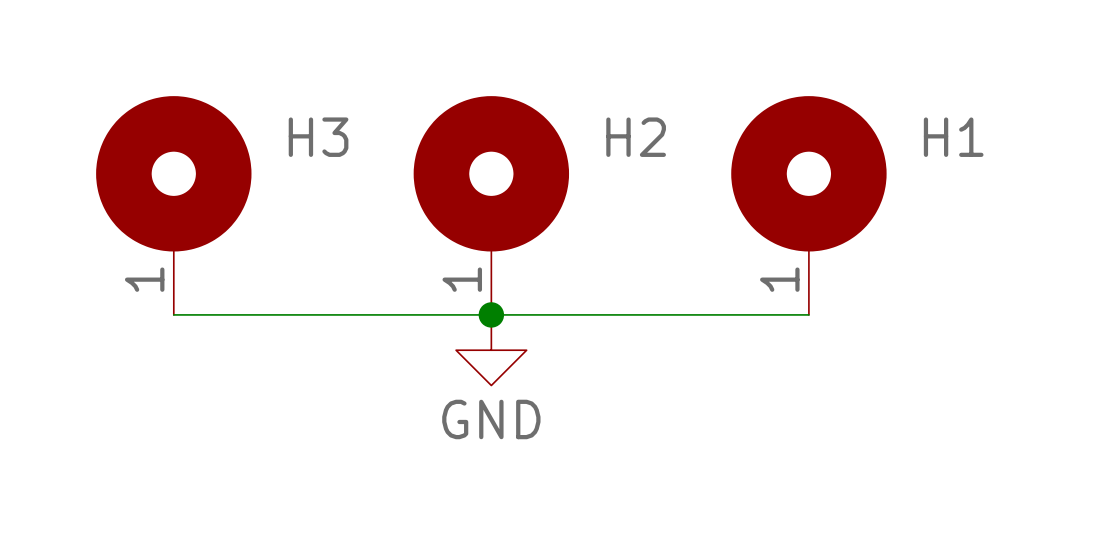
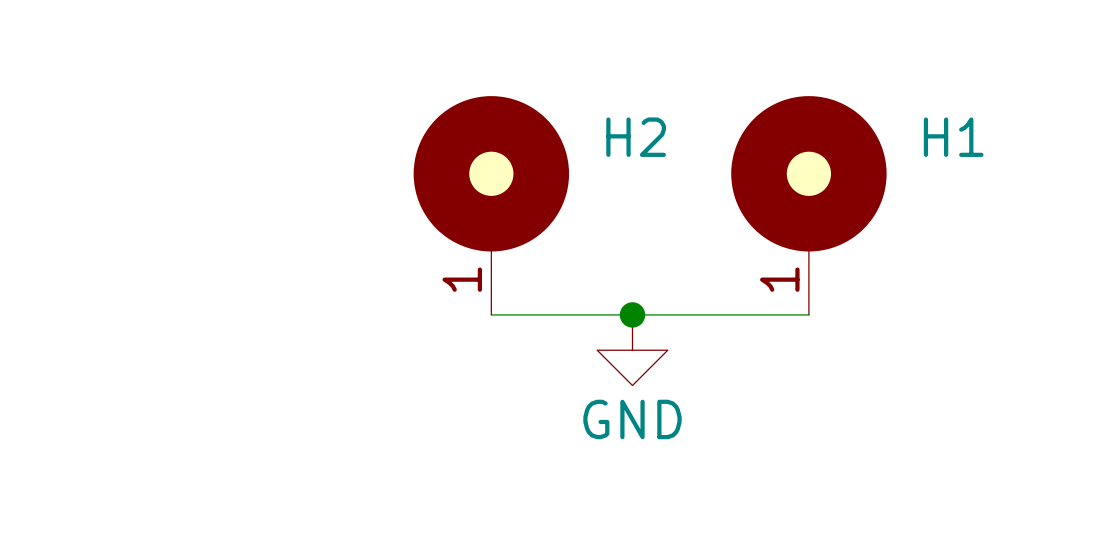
H3: (173, 205) -> none
wire: (173, 314) (491, 314) -> none
junction position: (491, 314) -> (632, 314)
power symbol position: GND (491, 350) -> GND (632, 350)

